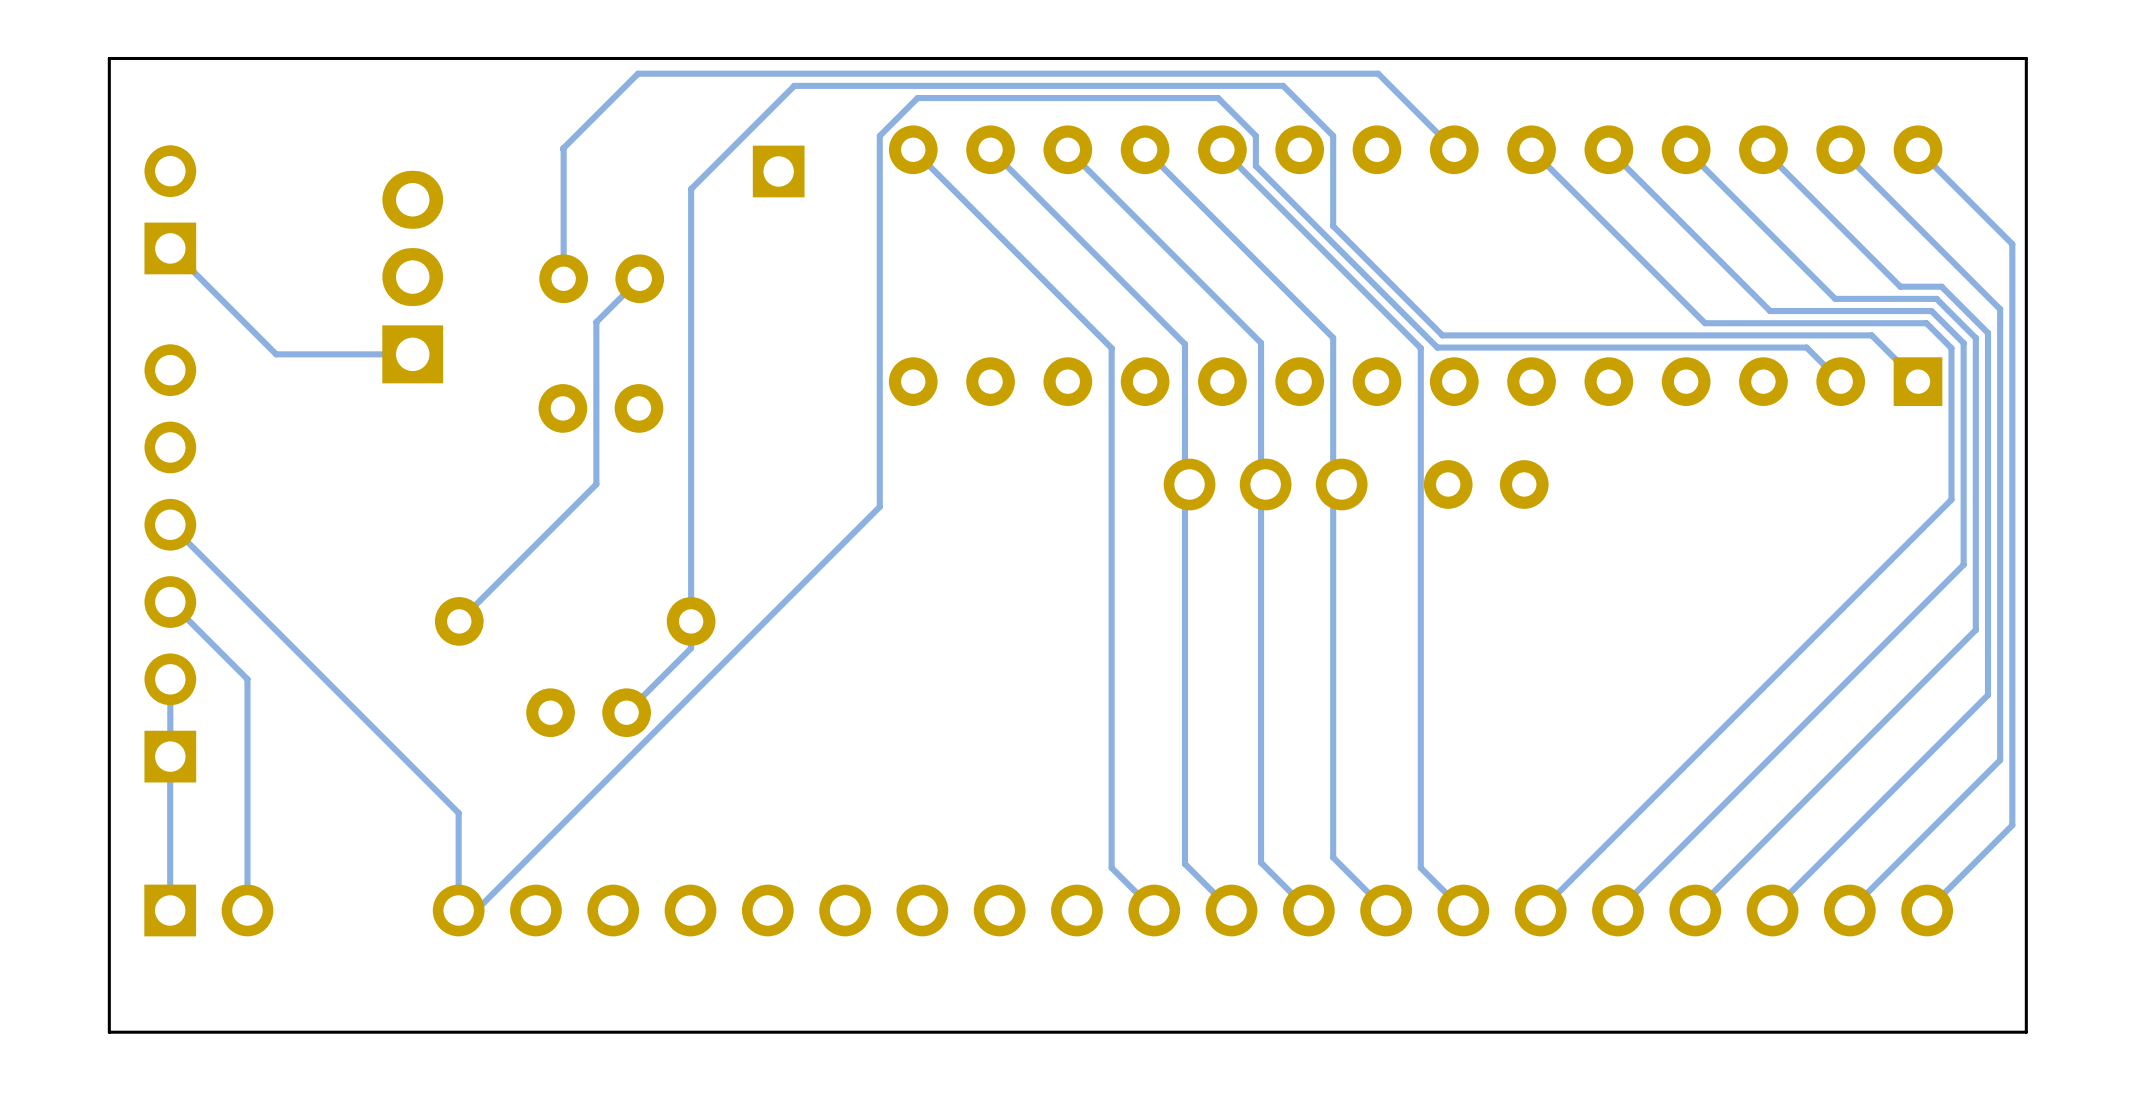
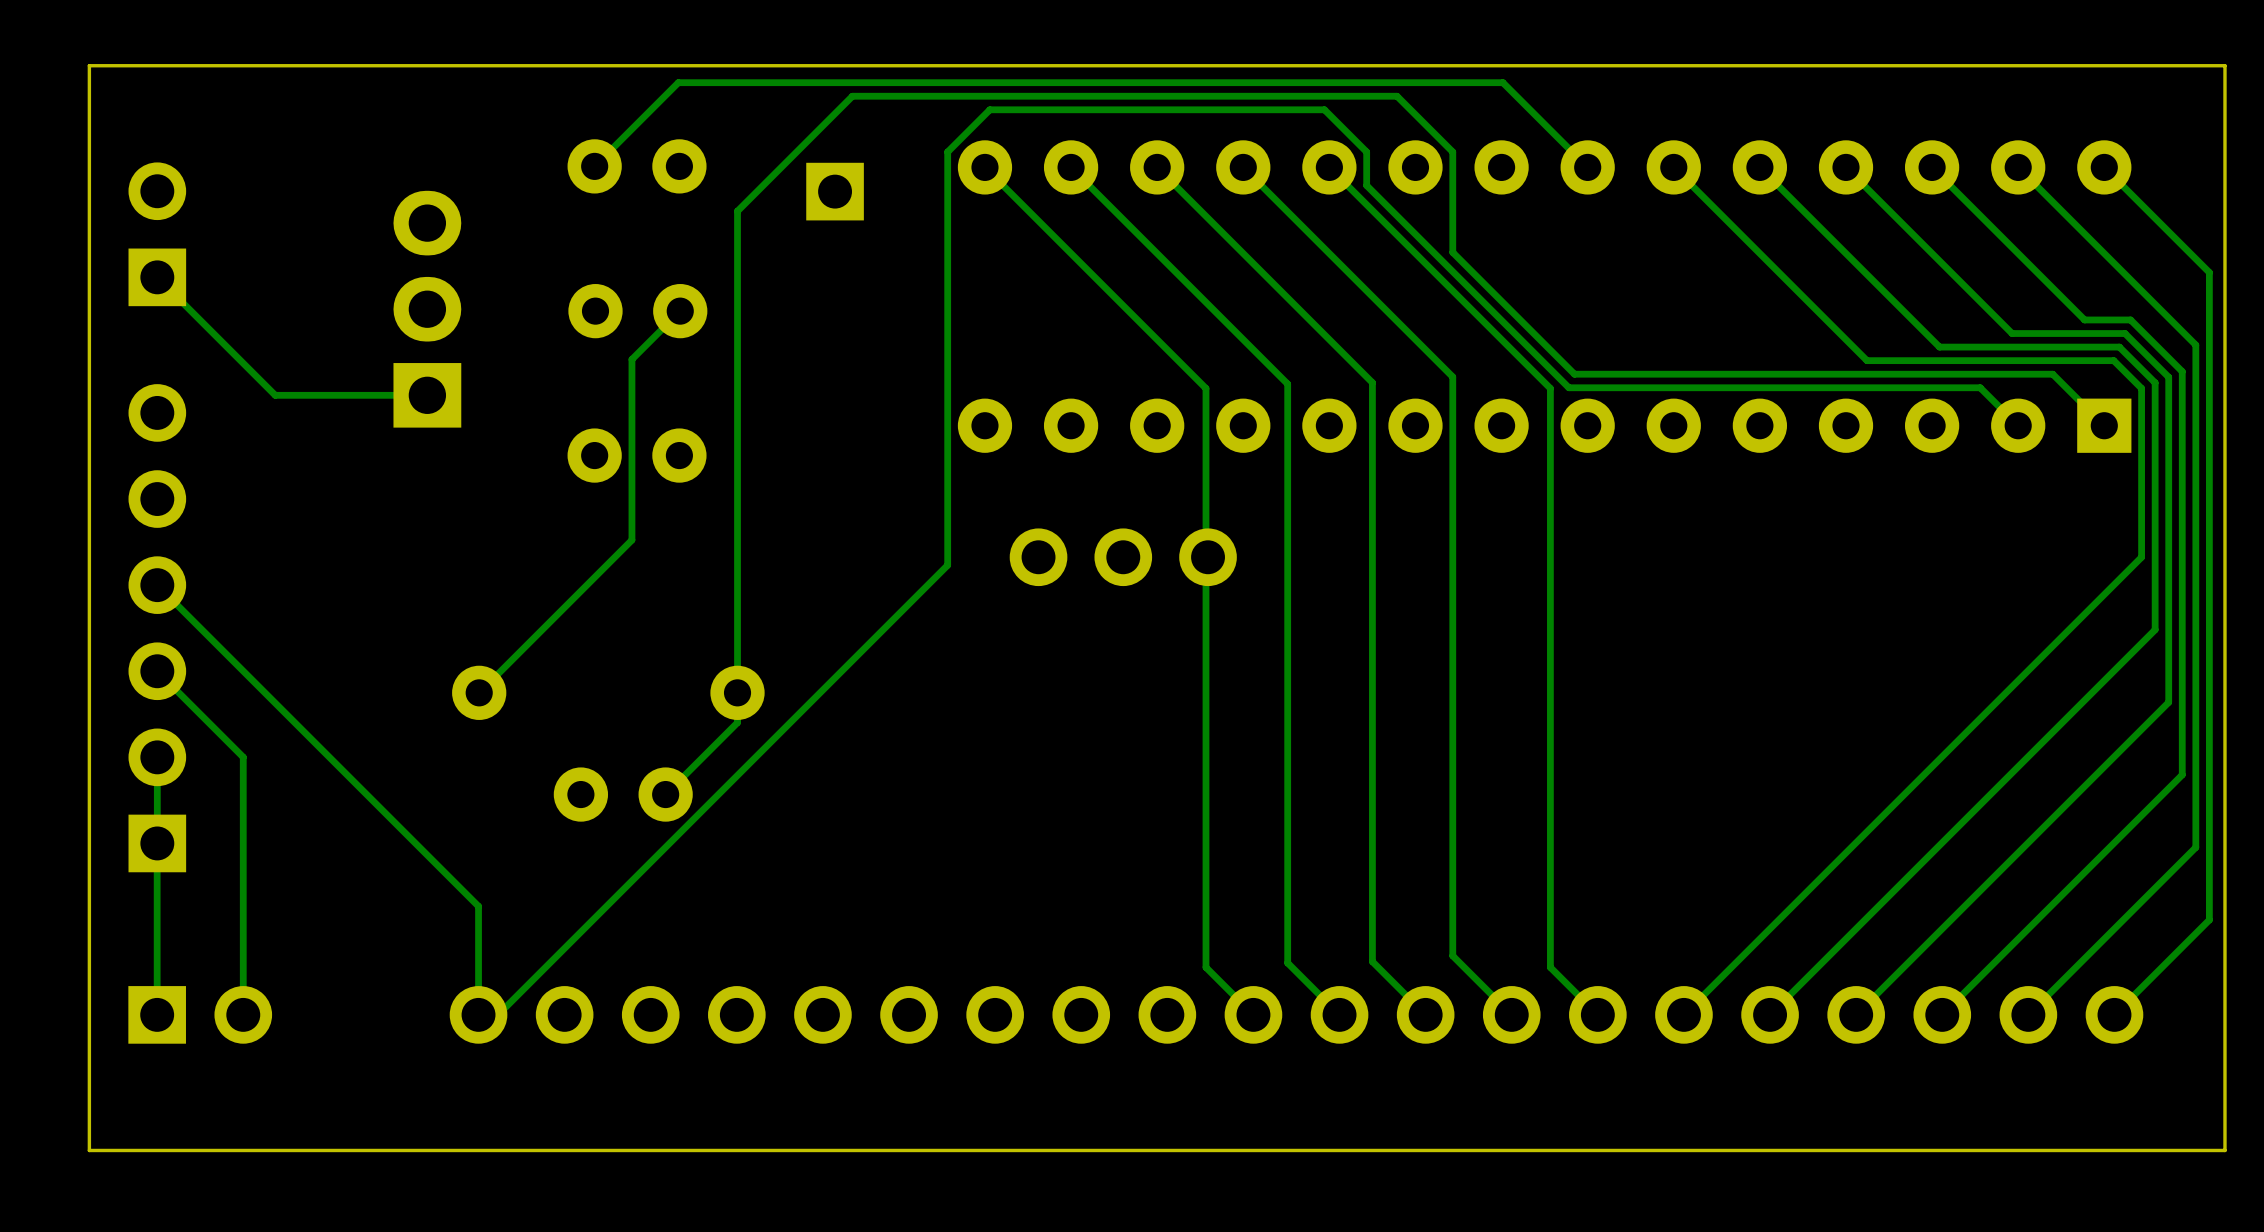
track: (563, 148) (563, 278) -> none
part: none -> (637, 166)
part position: (1265, 484) -> (1123, 557)
part: (1486, 484) -> none

